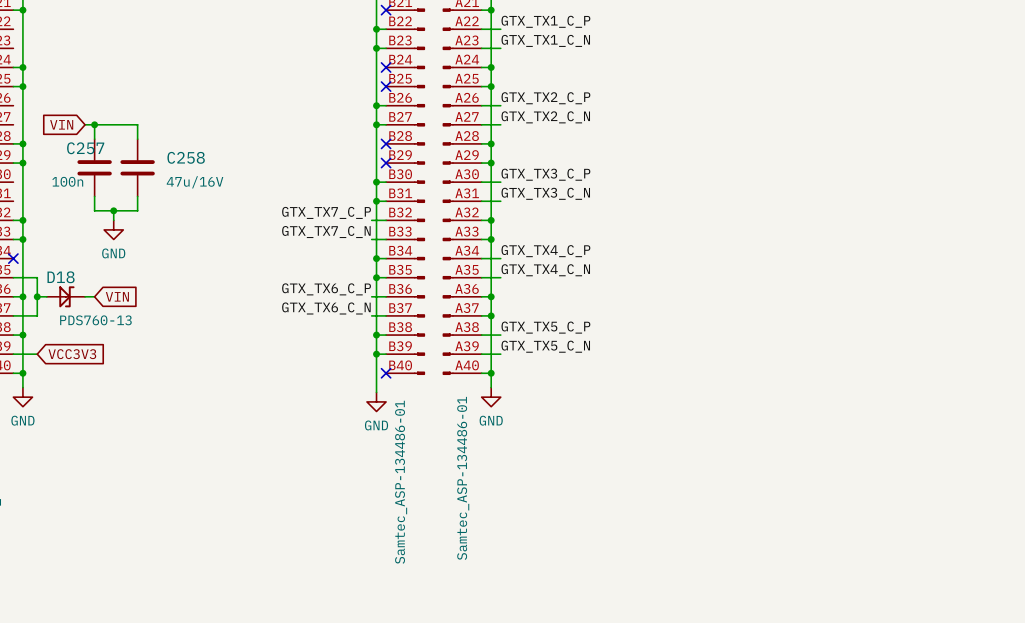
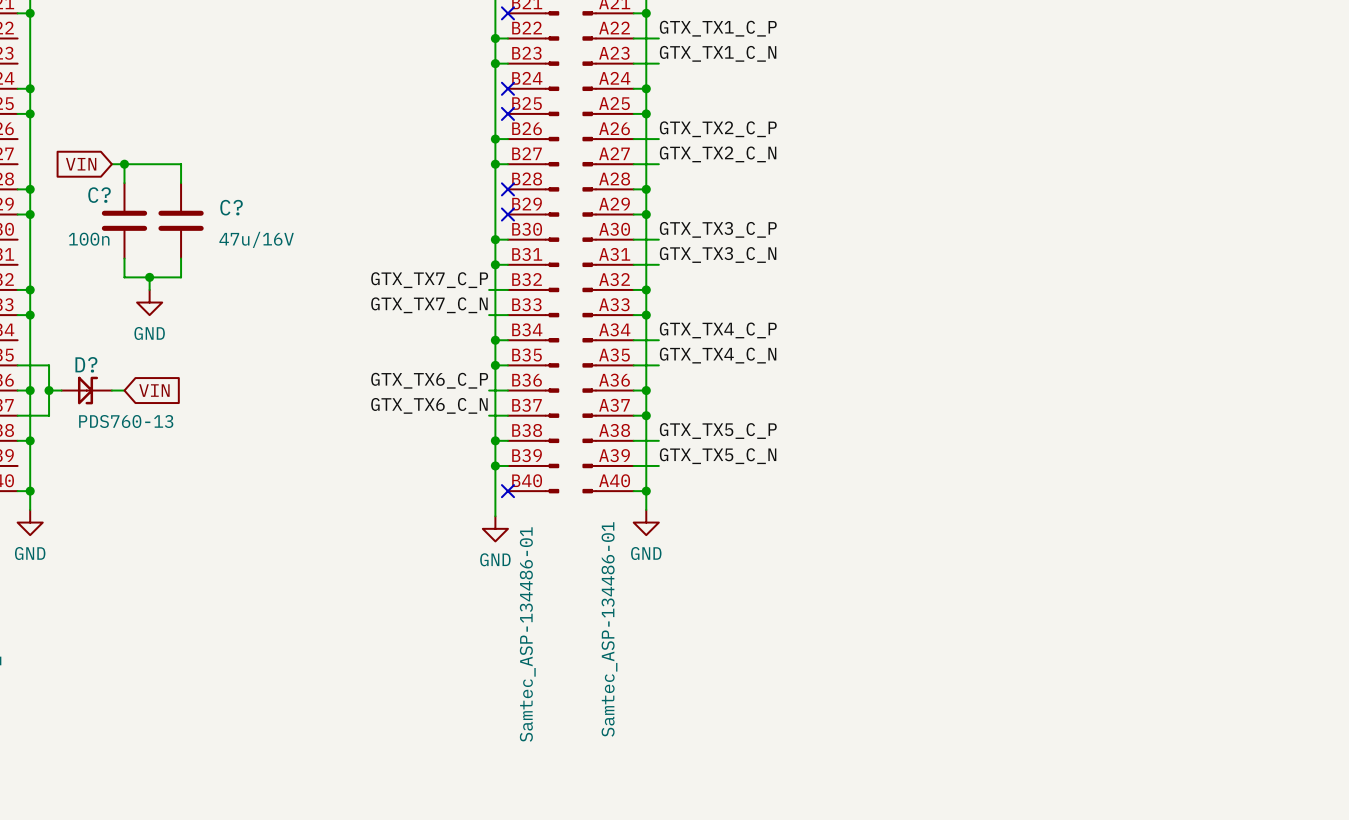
C257 name: C257 (85, 148) -> C? (99, 195)
C258 name: C258 (186, 157) -> C? (231, 207)
no-connect mark: (13, 258) -> none
D18 name: D18 (61, 277) -> D? (86, 364)
wire: (13, 354) (37, 354) -> none
global label: VCC3V3 (72, 354) -> none

